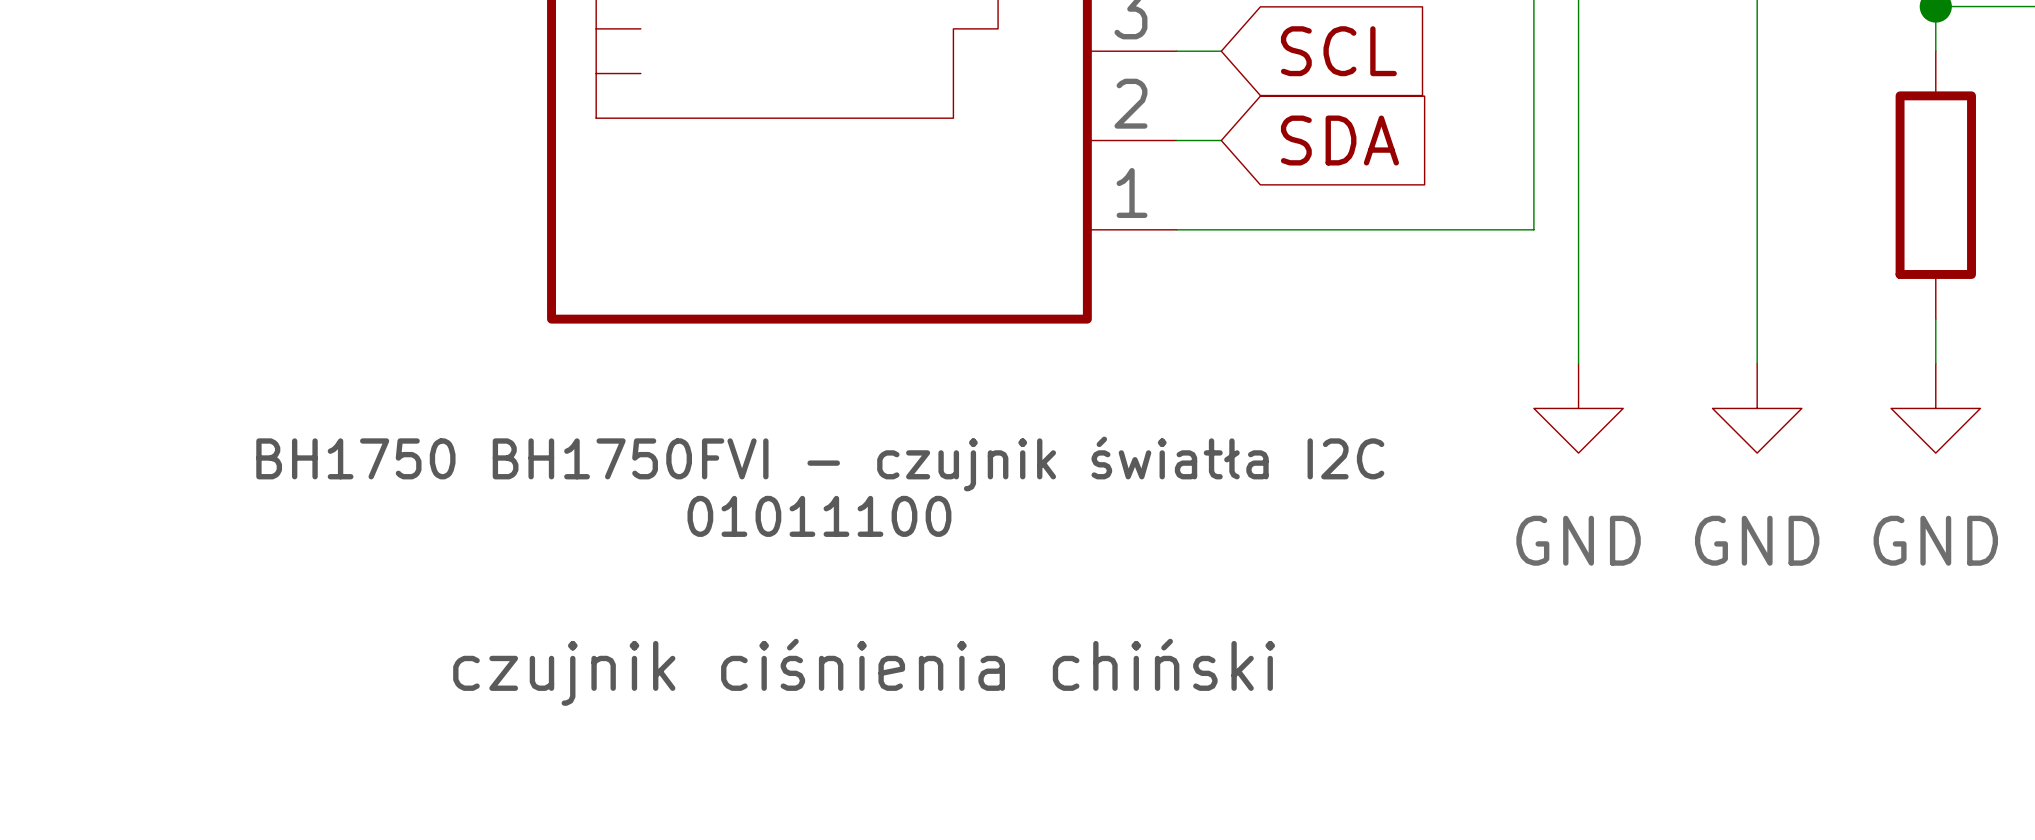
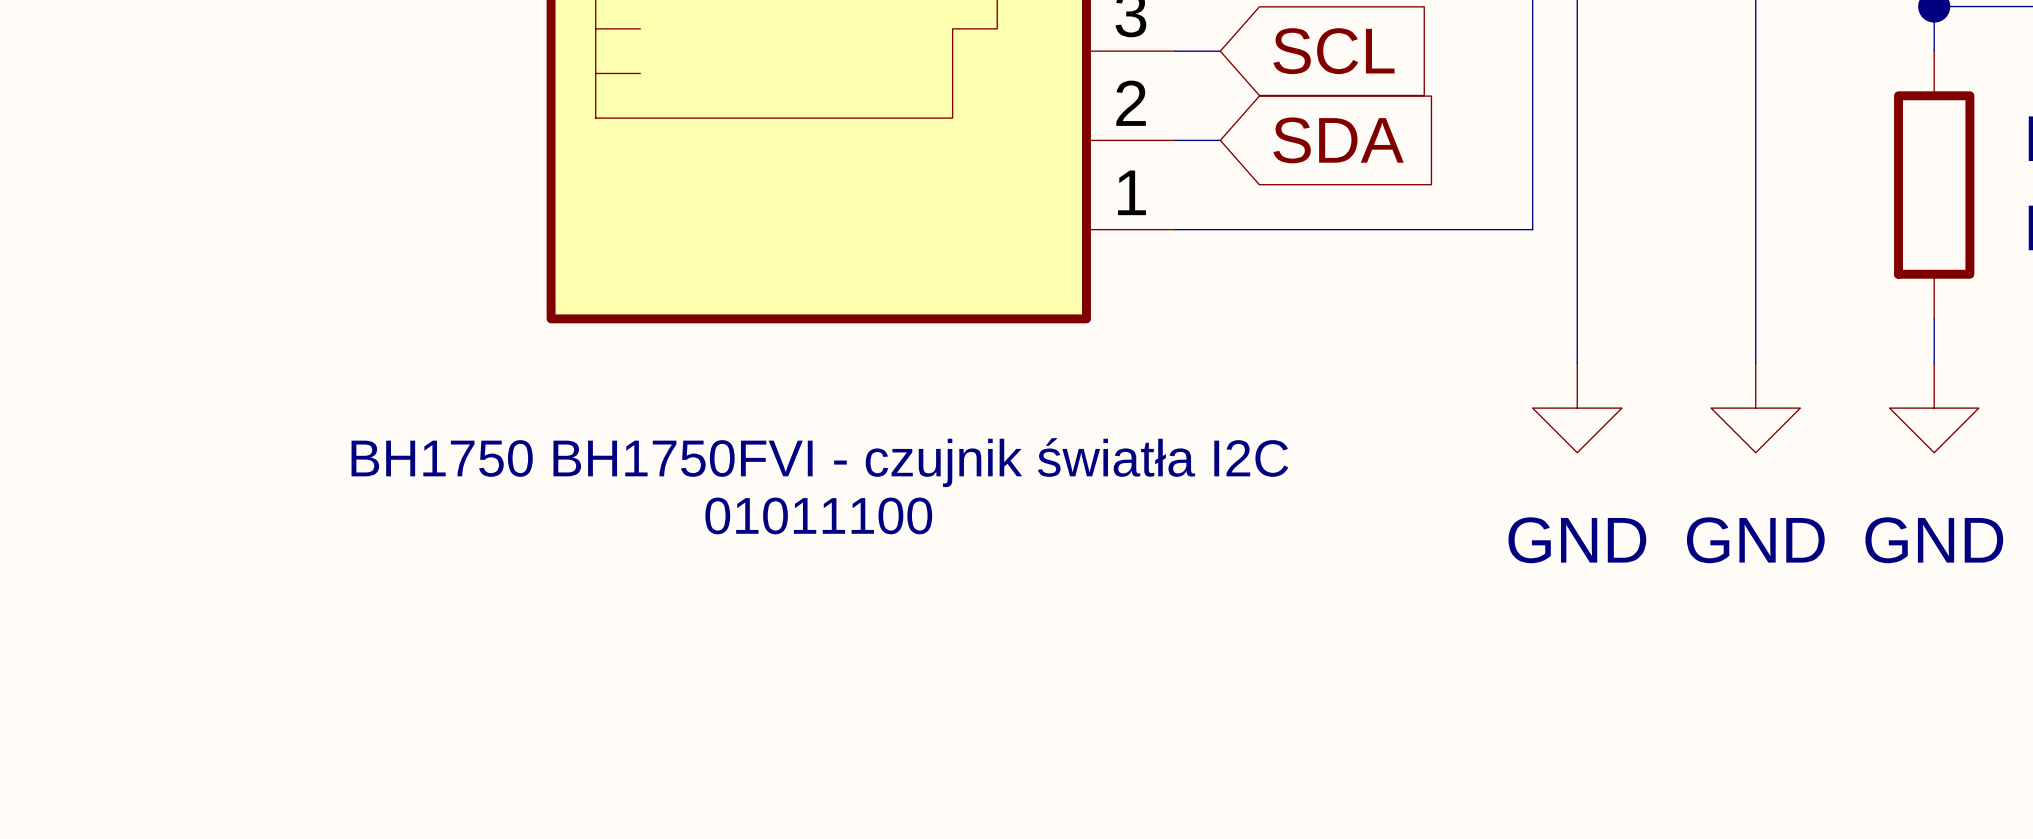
text: czujnik ciśnienia chiński (864, 672) -> none

